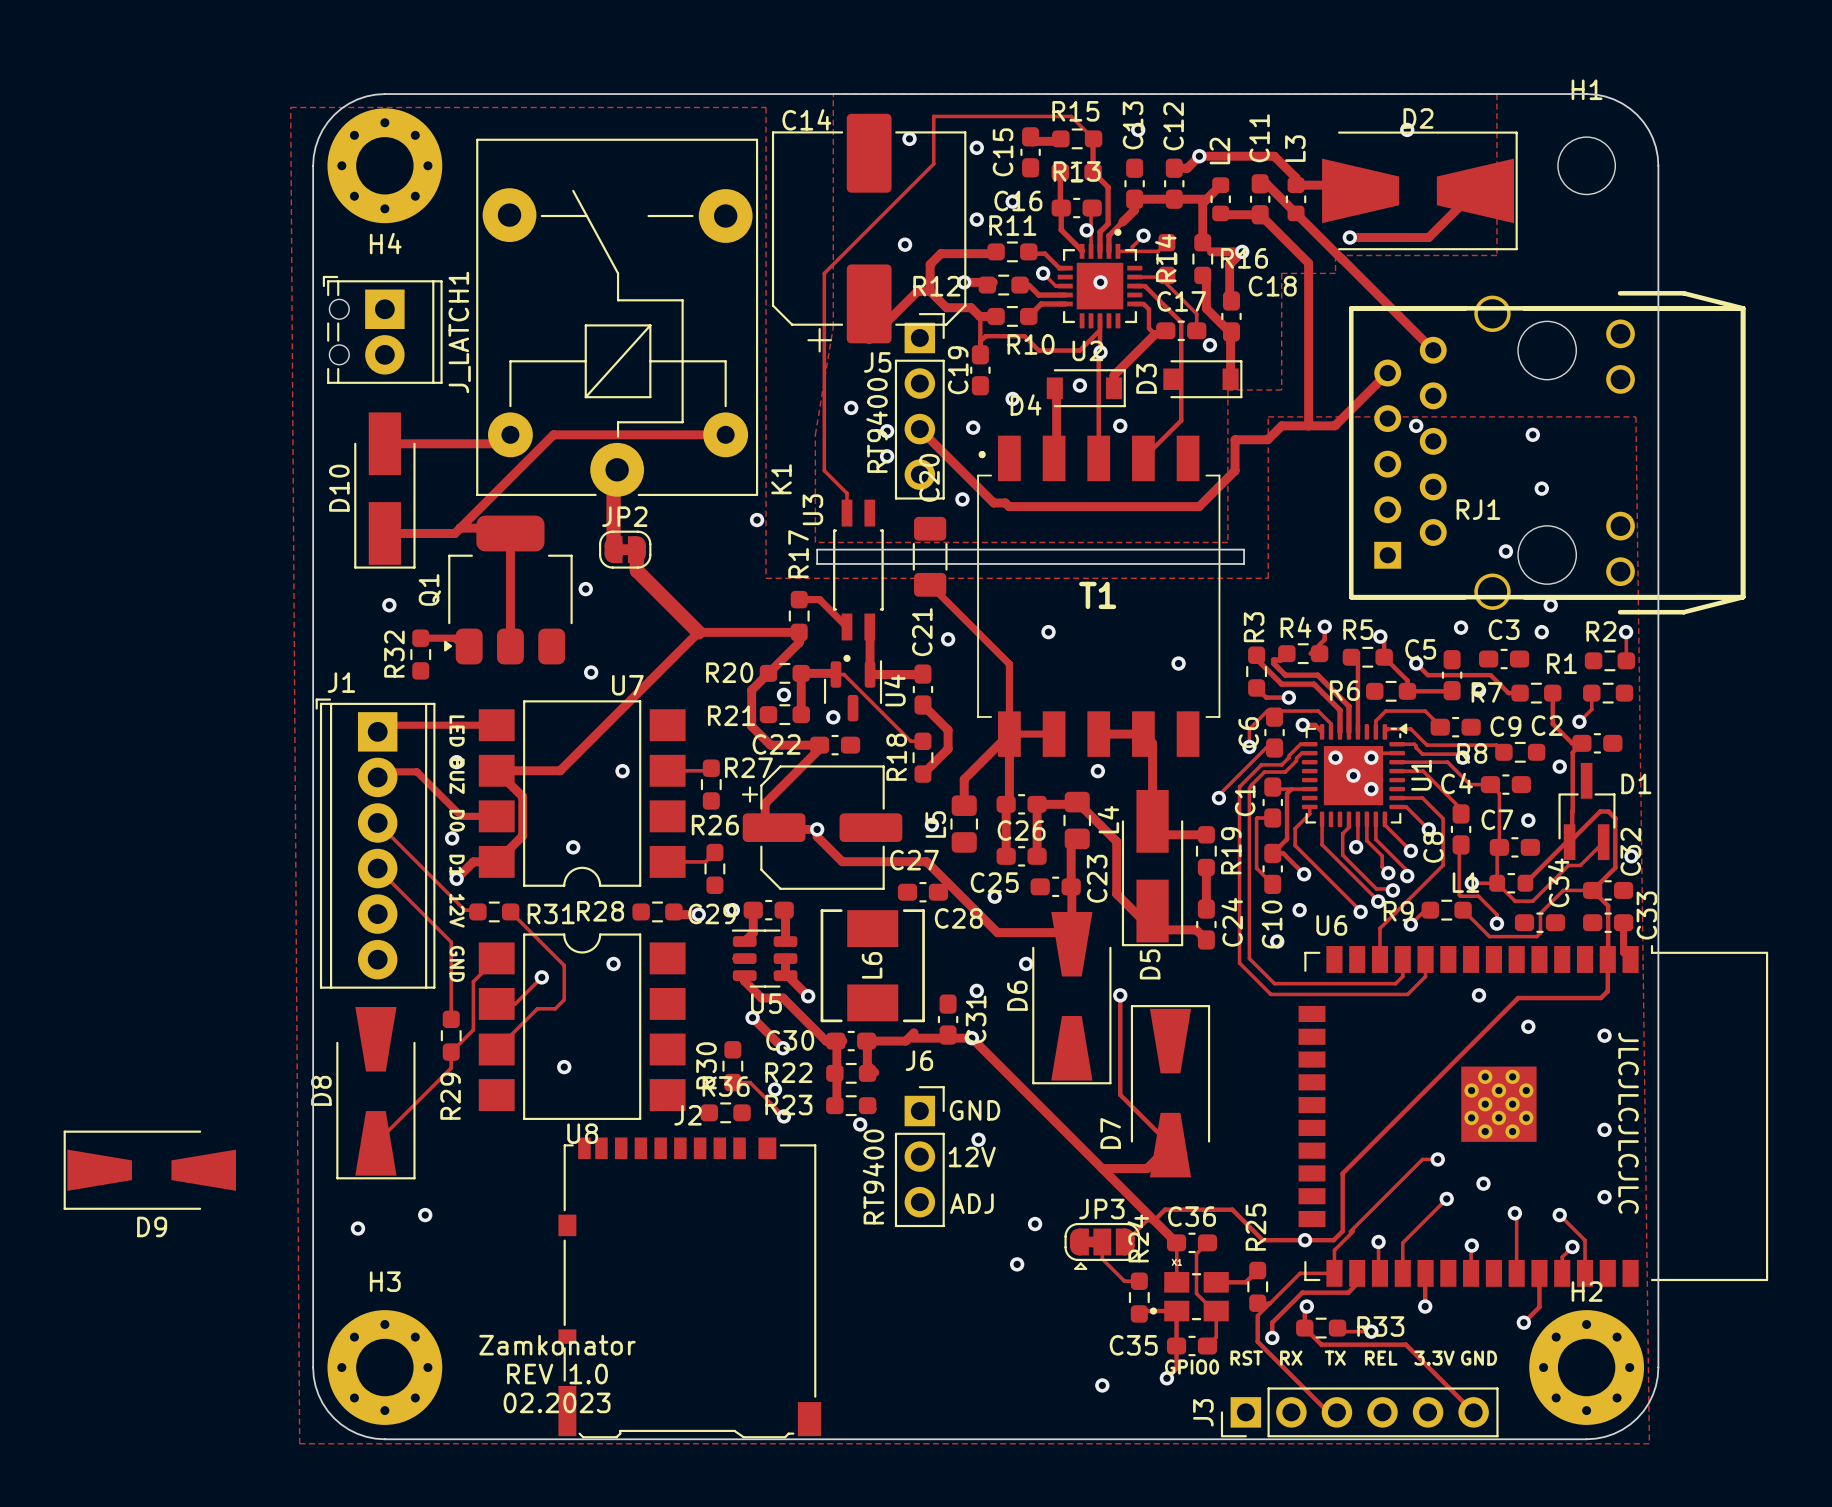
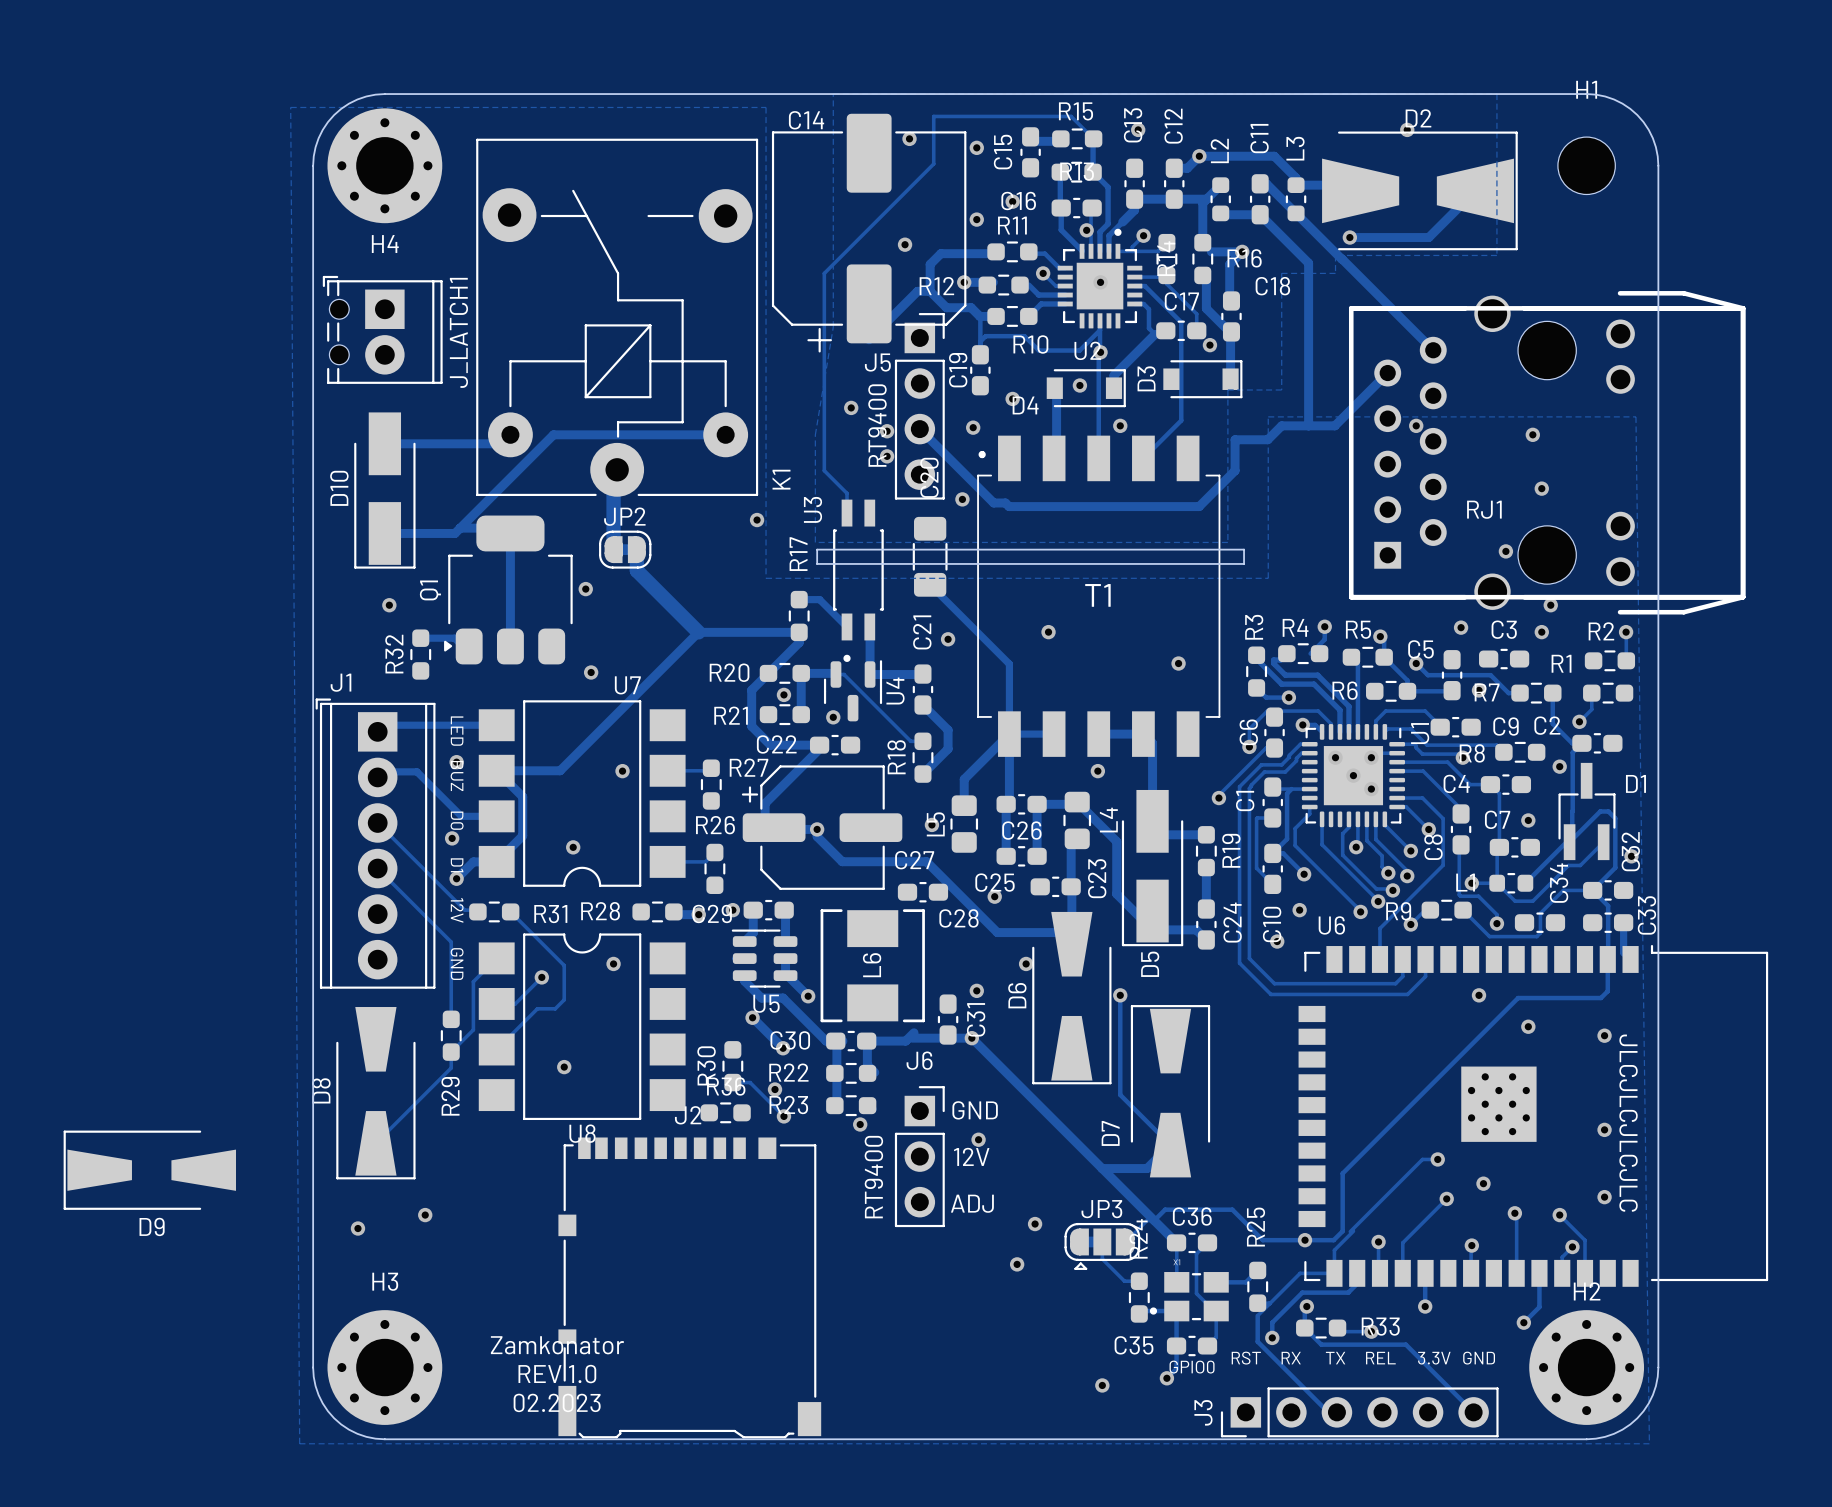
U1 footprint: [1301, 723, 1408, 828] -> [1301, 724, 1406, 828]
U1 name position: U1 (1421, 775) -> U1 (1420, 733)

